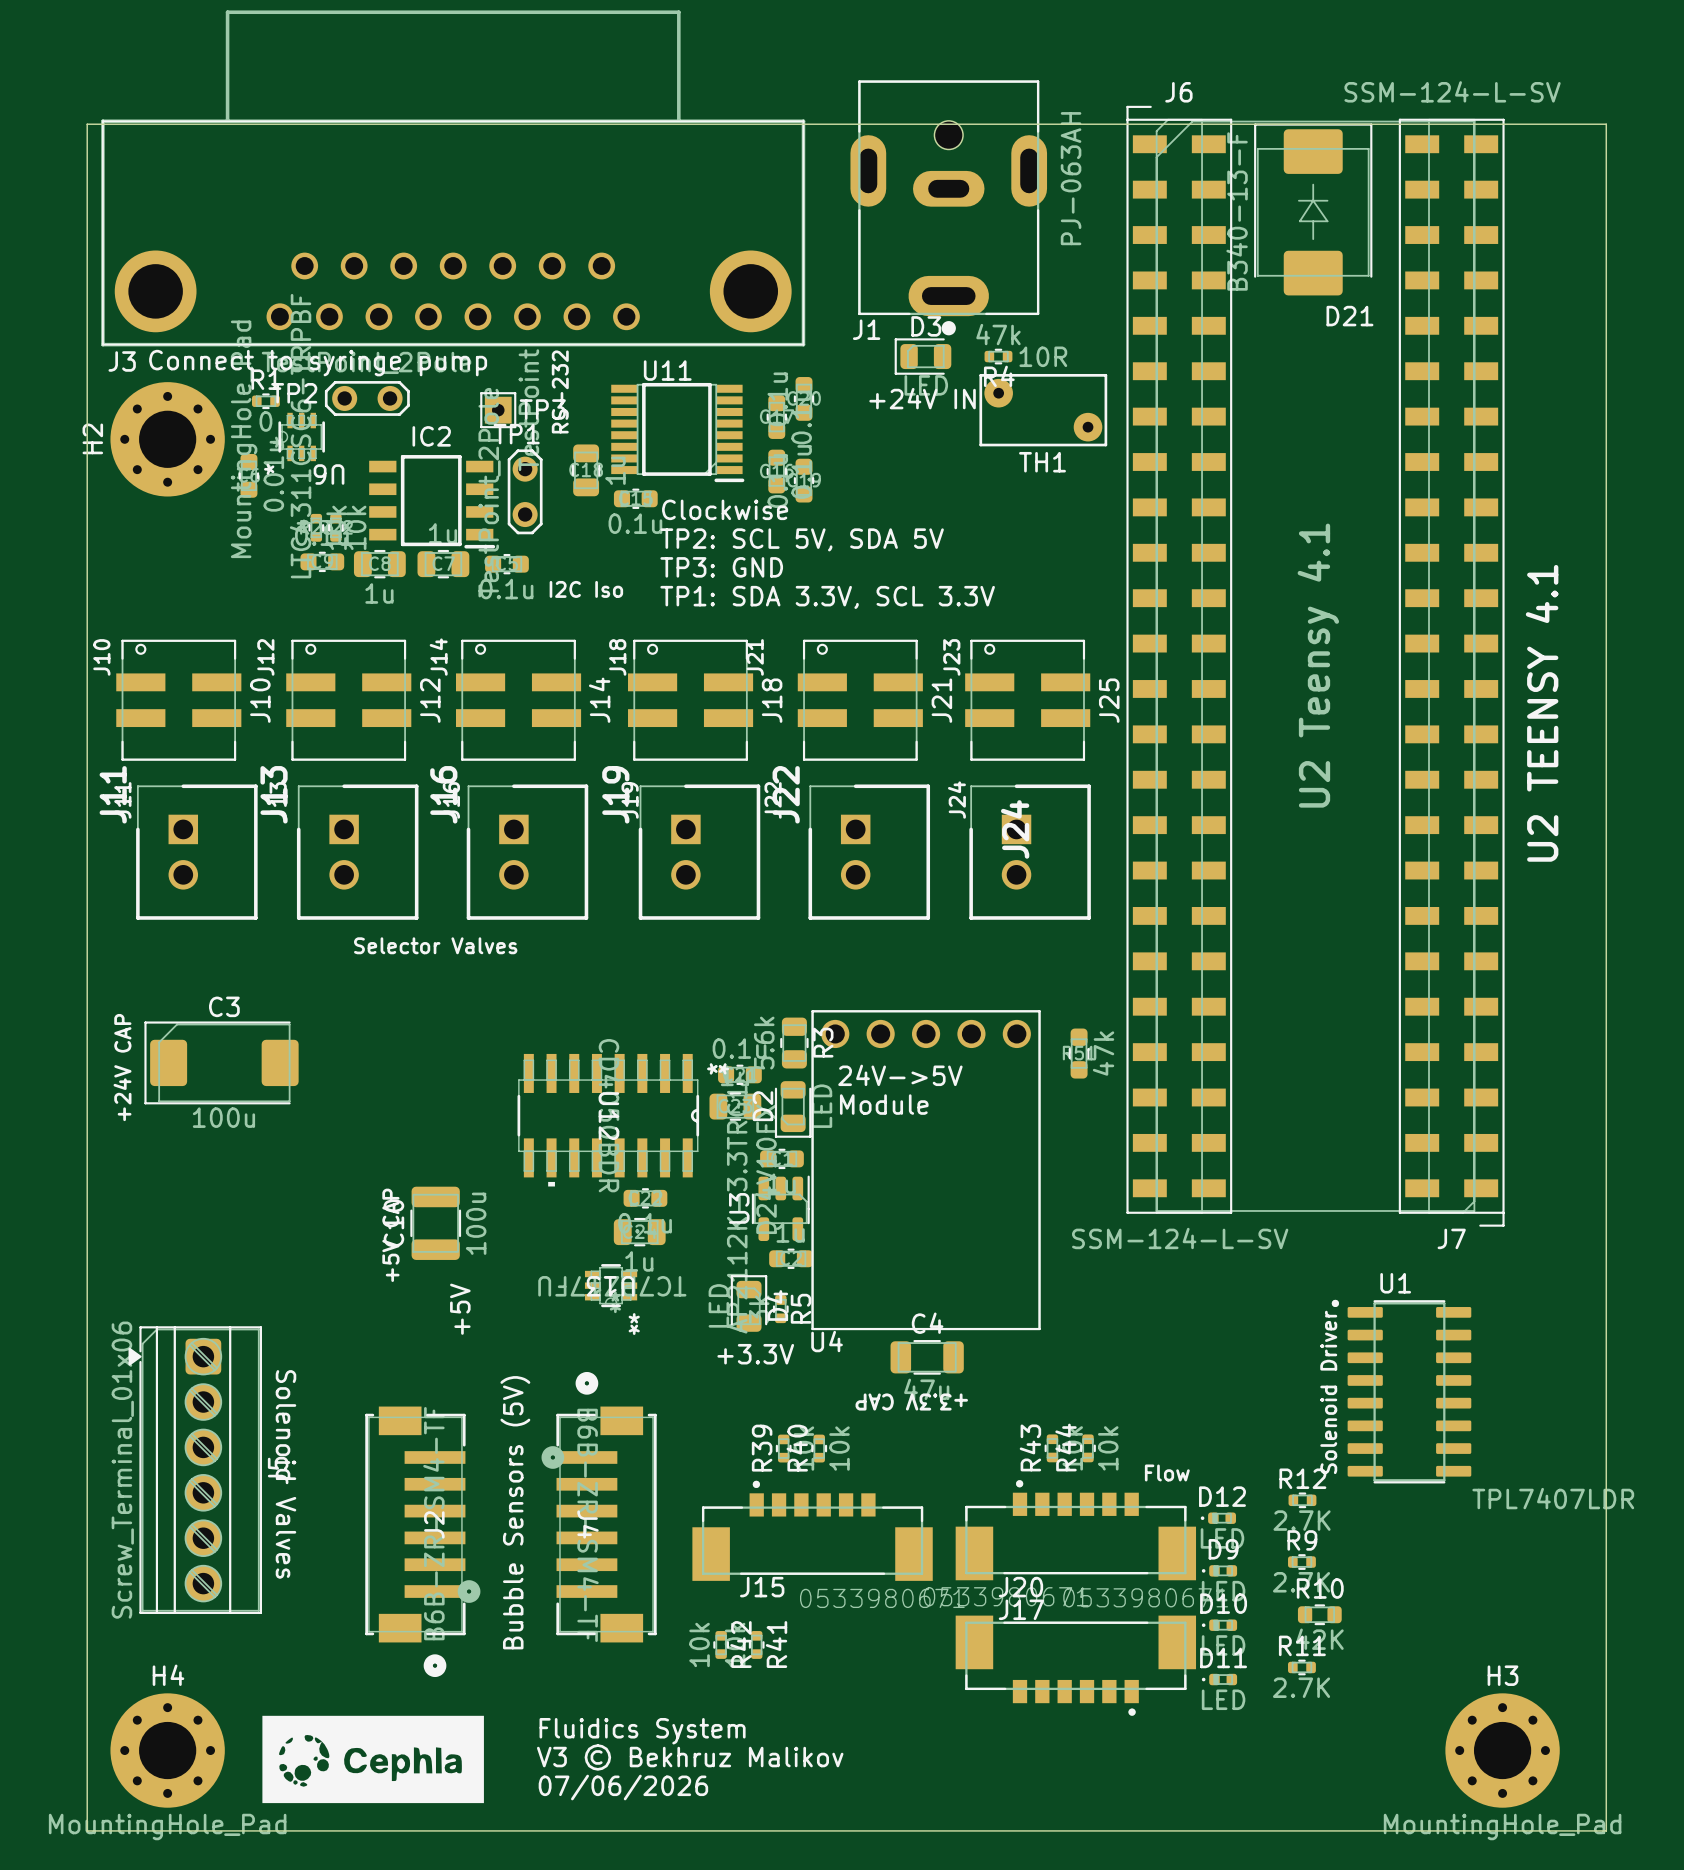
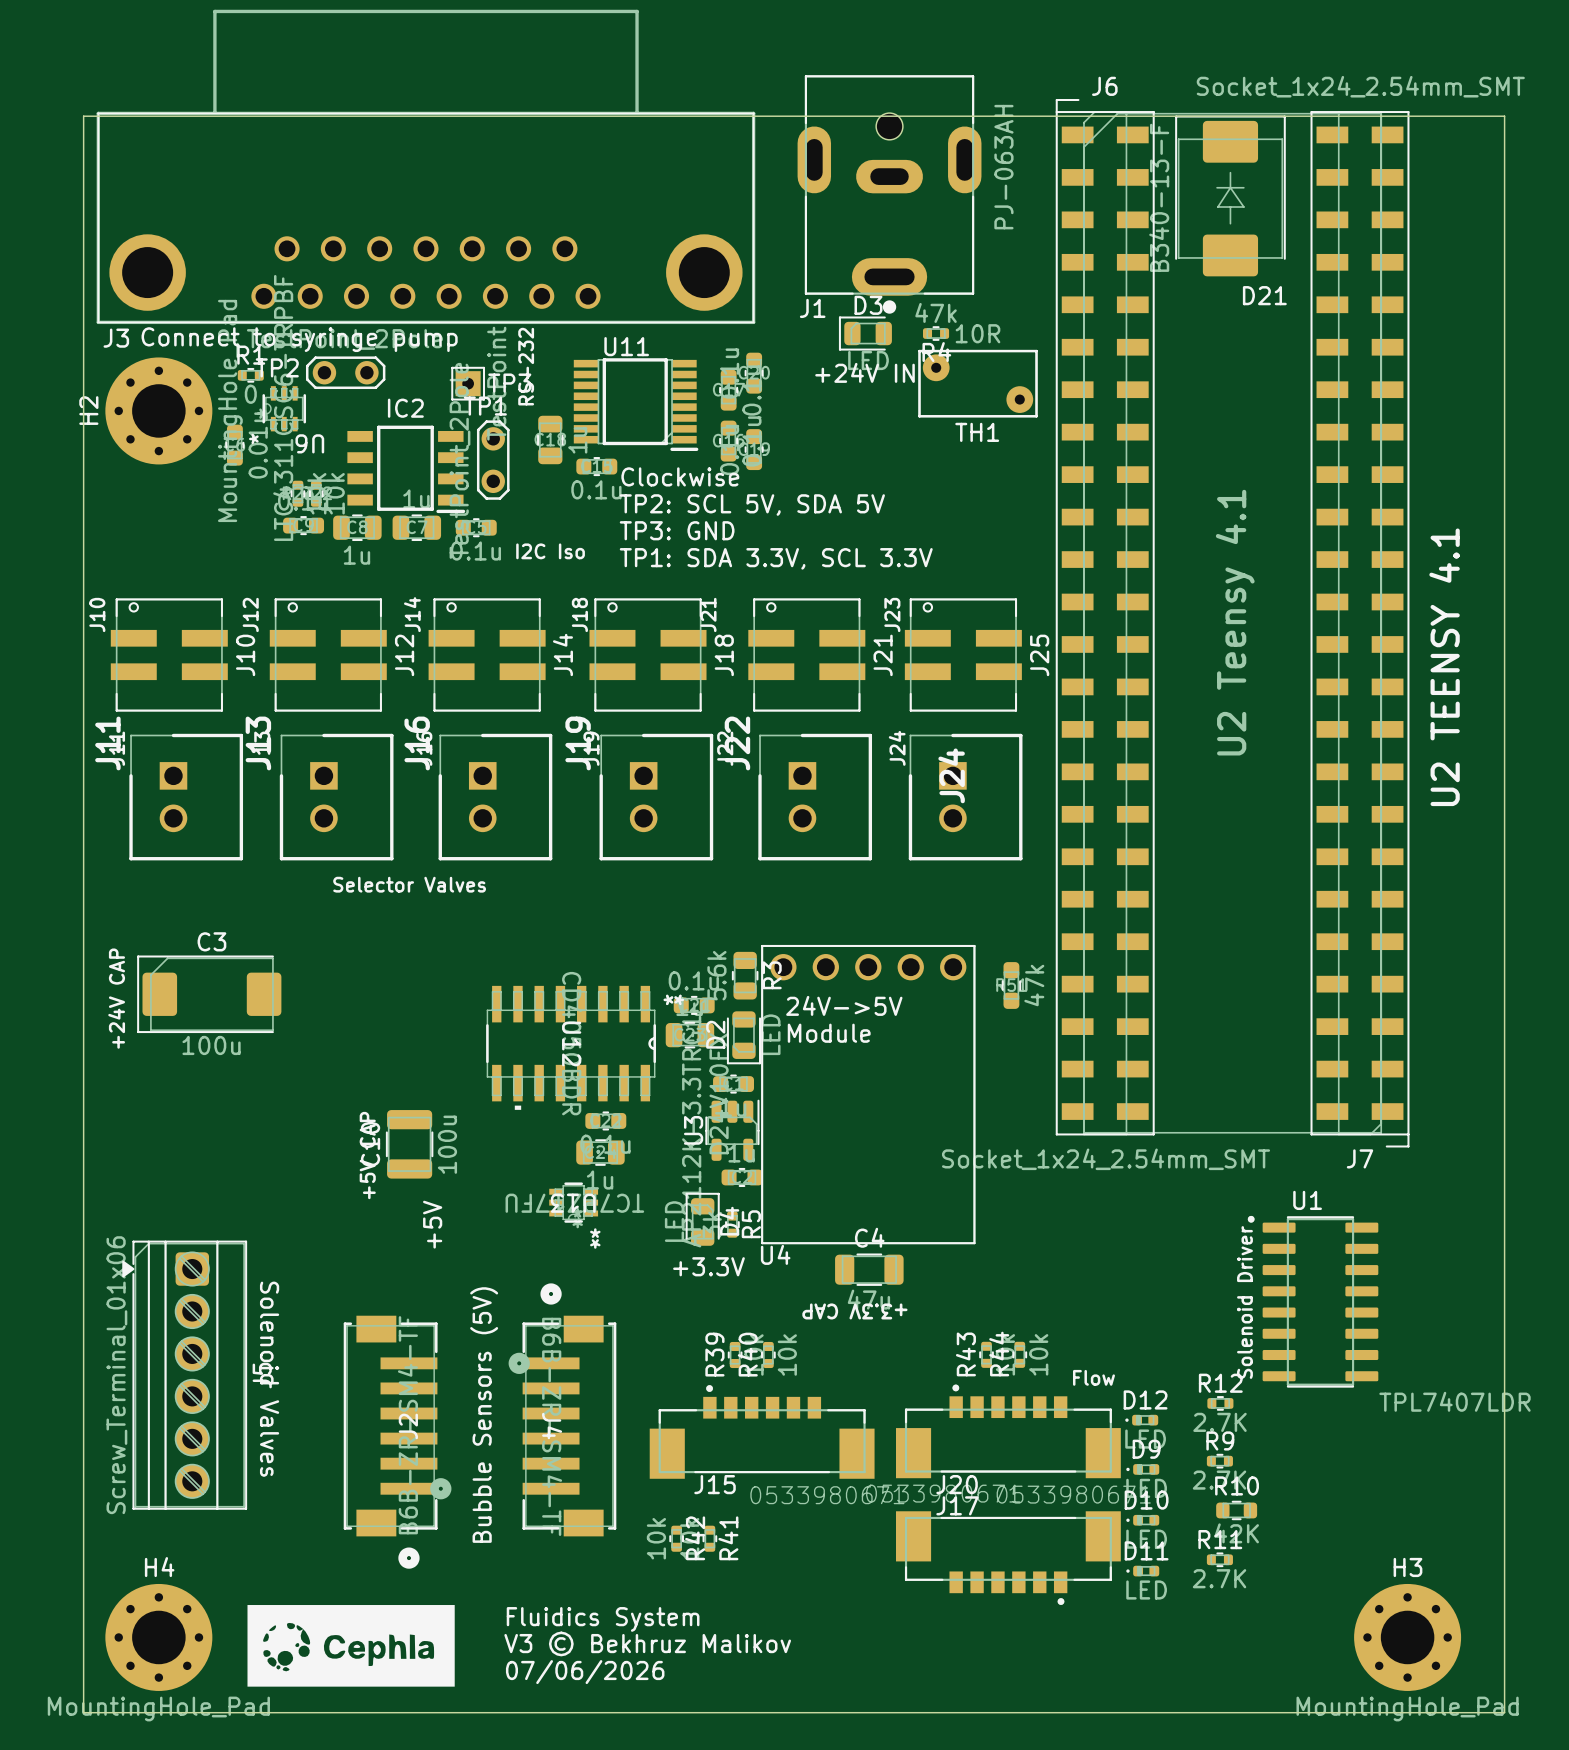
J7 value: SSM-124-L-SV (1452, 91) -> Socket_1x24_2.54mm_SMT (1360, 86)
J6 value: SSM-124-L-SV (1180, 1238) -> Socket_1x24_2.54mm_SMT (1106, 1159)

